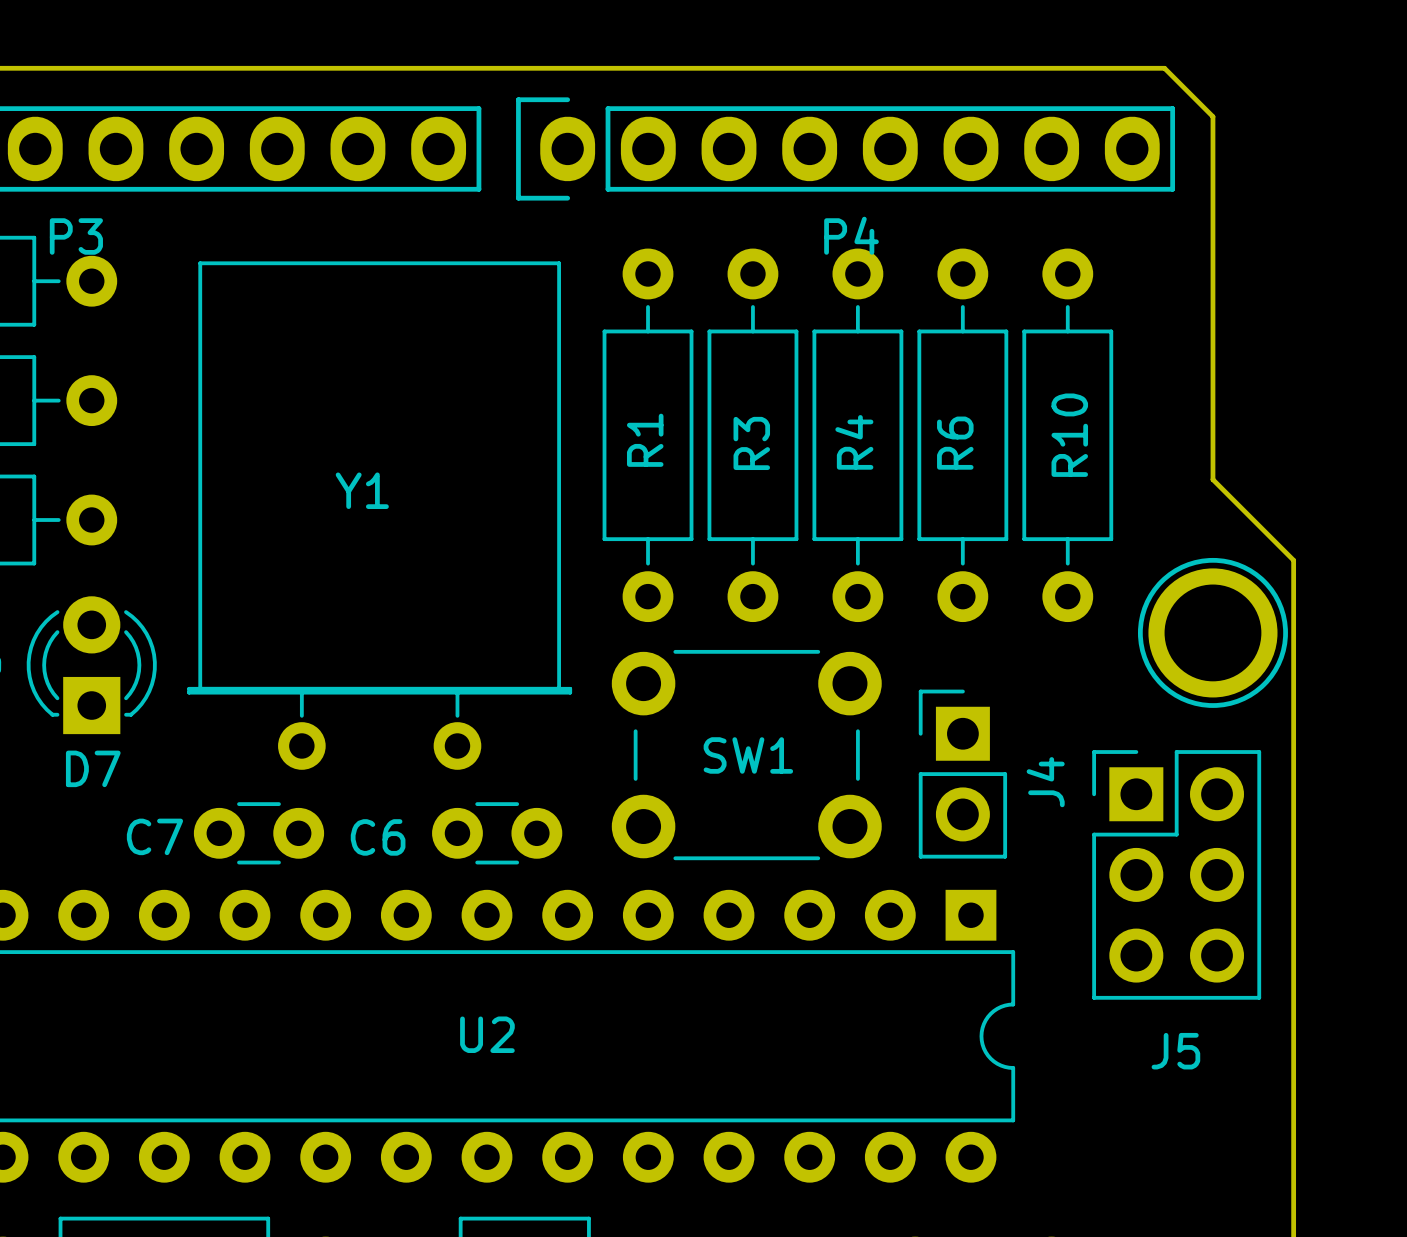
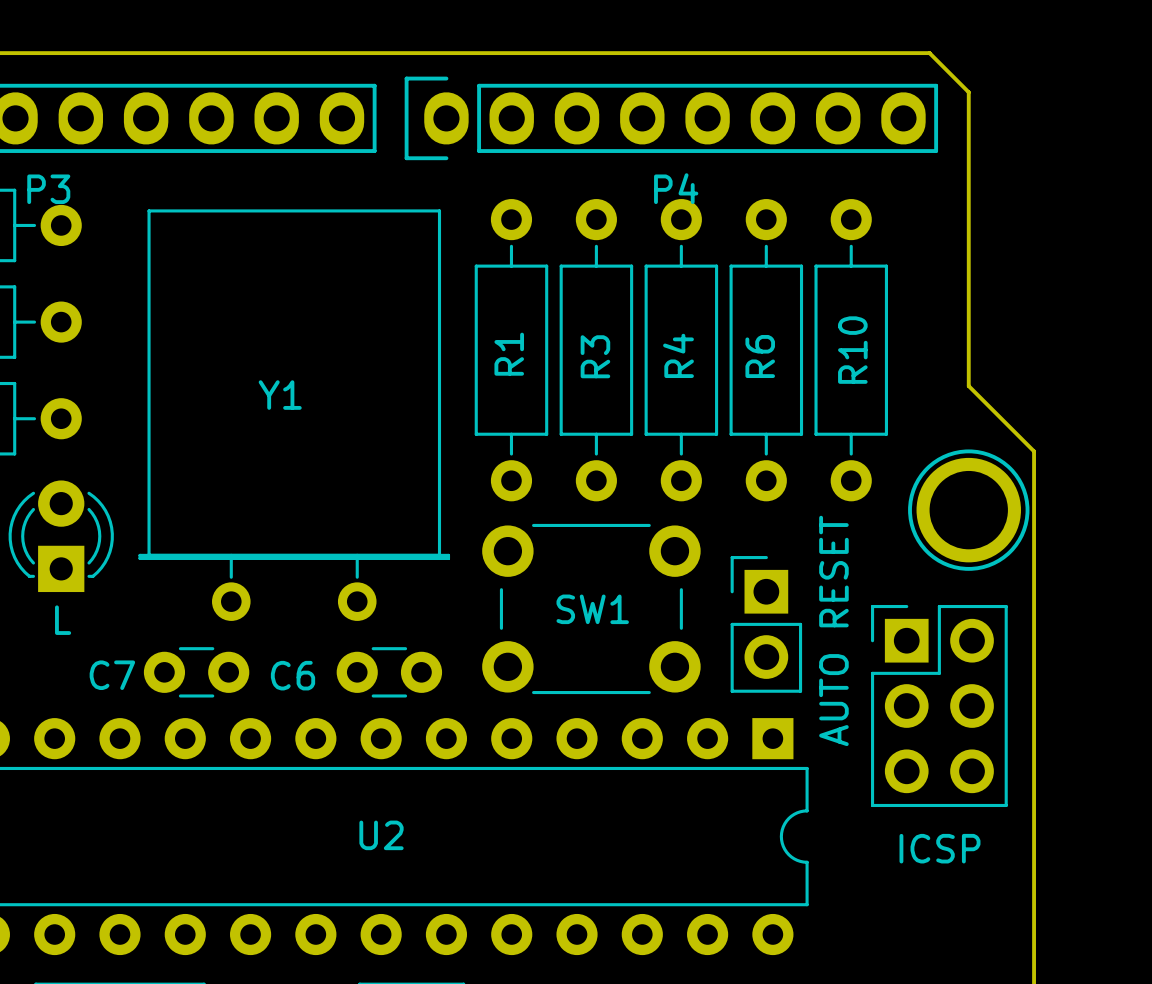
D7 name: D7 (93, 768) -> L (63, 620)
J4 name: J4 (1045, 782) -> AUTO RESET (833, 630)
J5 name: J5 (1175, 1051) -> ICSP (939, 848)

